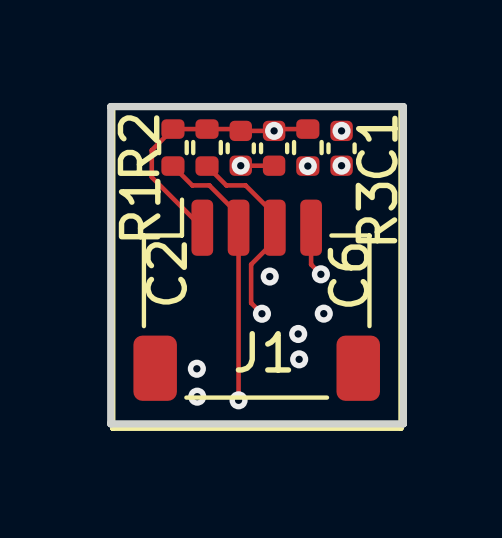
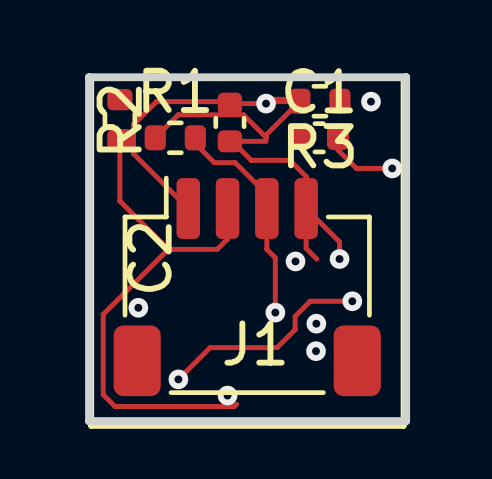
track: none -> (263, 99) (297, 99) (299, 101) (266, 134) (266, 137) (243, 114) (178, 114) (155, 137)
via: none -> (370, 101)
via: (341, 130) -> none
R2 position: (172, 147) -> (119, 119)
R1 rotation: 0° (207, 147) -> 90° clockwise (175, 137)
R3 rotation: 0° (307, 147) -> 90° clockwise (319, 101)
C6: (274, 148) -> none
C1 rotation: 0° (341, 148) -> 90° clockwise (319, 137)
track: none -> (228, 137) (251, 160) (289, 160) (306, 176) (306, 208) (339, 241) (339, 259)
track: none -> (337, 137) (337, 149) (356, 168) (392, 168)
track: none -> (119, 139) (119, 201) (168, 249)
via: (240, 165) -> none
via: (341, 165) -> none
track: (172, 166) (192, 185) (209, 185) (238, 214) (238, 227) -> none
via: (307, 166) -> none
via: none -> (392, 168)
track: (274, 240) (251, 264) (251, 302) (261, 313) -> (266, 222) (266, 249) (275, 257) (275, 312)
track: (238, 255) (238, 400) -> (227, 238) (217, 249) (168, 249)
track: none -> (168, 249) (103, 314) (103, 394) (115, 406) (234, 406) (236, 404)
via: (320, 274) -> none
via: none -> (339, 259)
via: (269, 276) -> none
via: none -> (295, 261)
via: (261, 313) -> none
via: (323, 313) -> none
track: none -> (352, 301) (310, 301) (295, 316) (295, 329) (277, 347) (210, 347) (178, 379)
via: none -> (352, 301)
via: none -> (138, 307)
via position: (298, 333) -> (275, 312)
via: none -> (316, 323)
via: (299, 359) -> none
via: none -> (316, 351)
via: (196, 368) -> none
via: none -> (178, 379)
via: (197, 396) -> none

